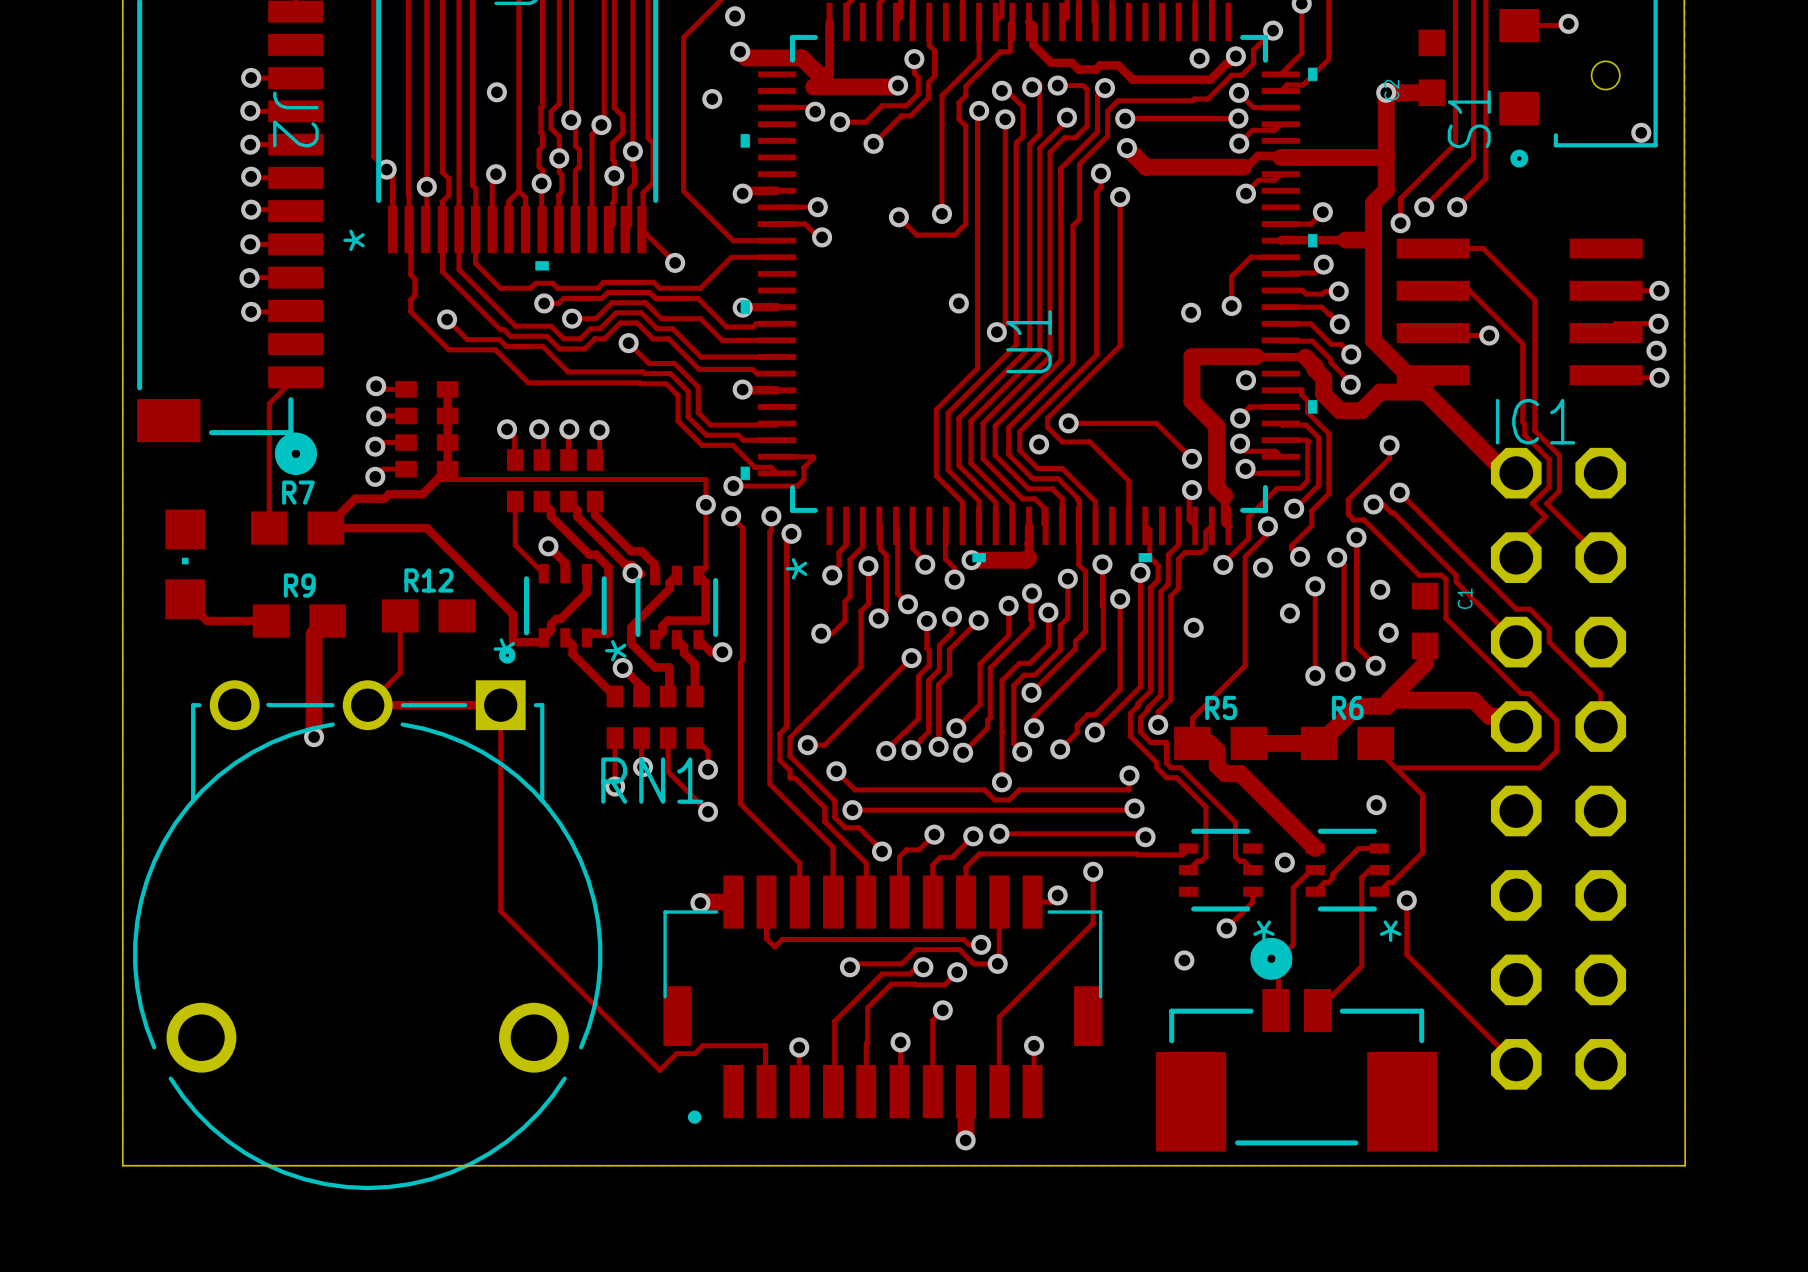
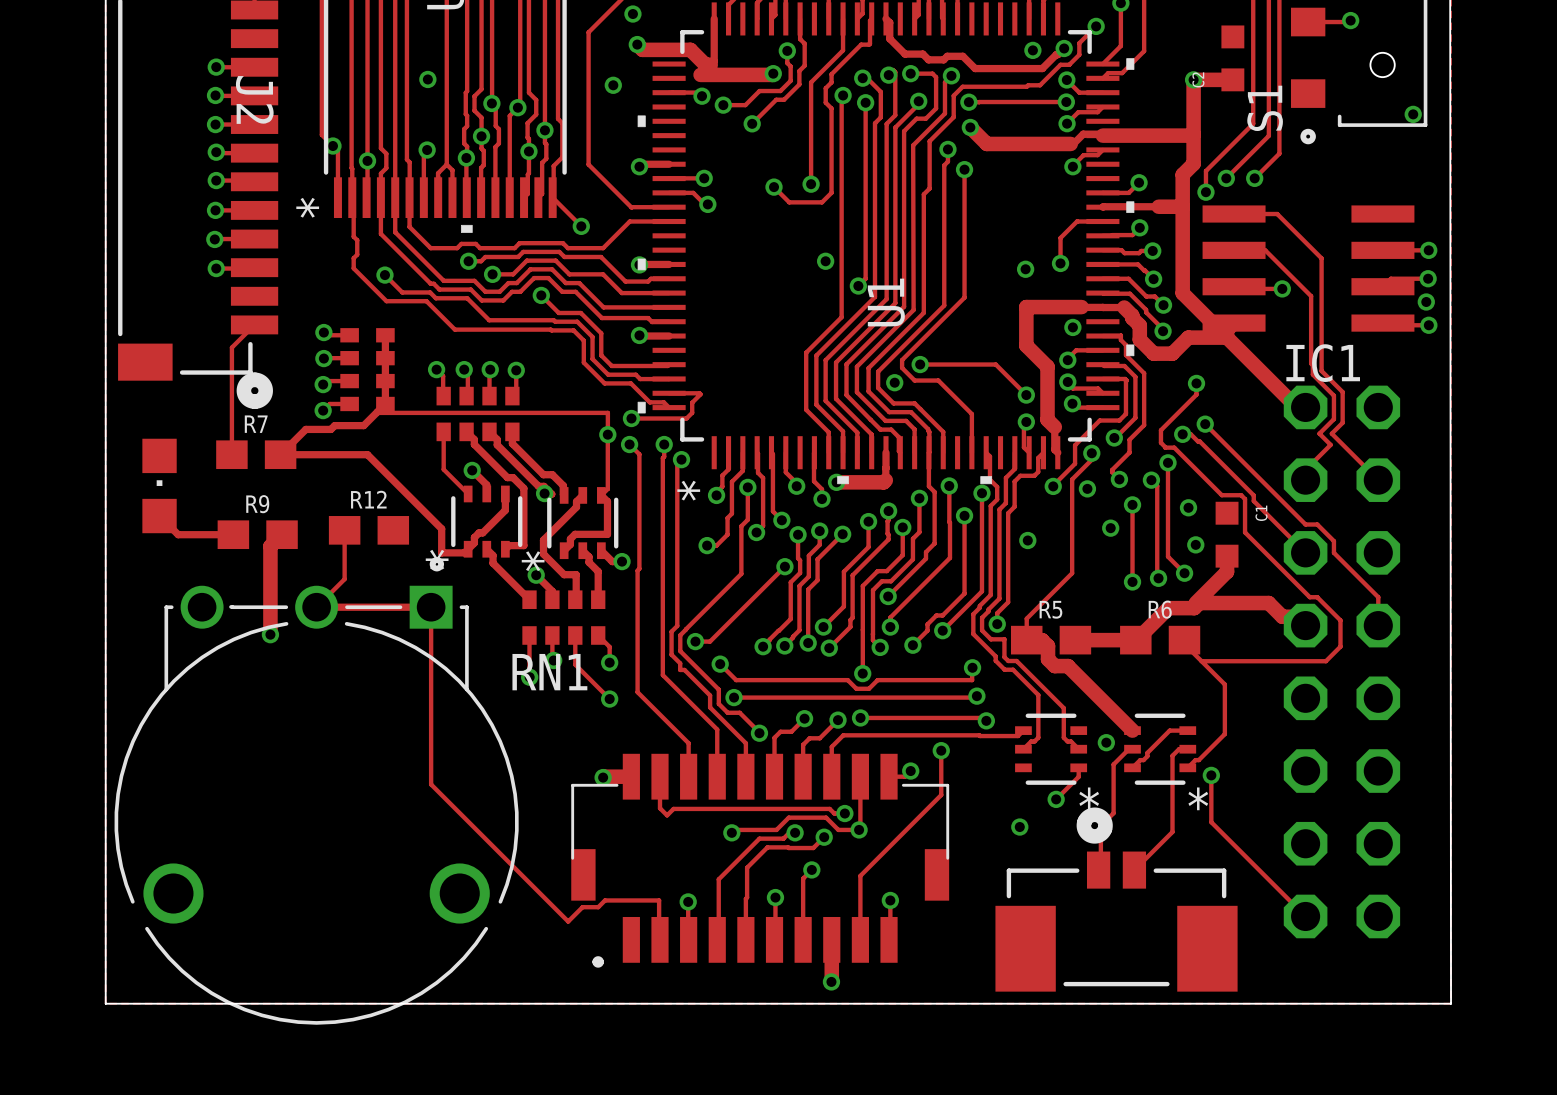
via: (1376, 805) -> none

